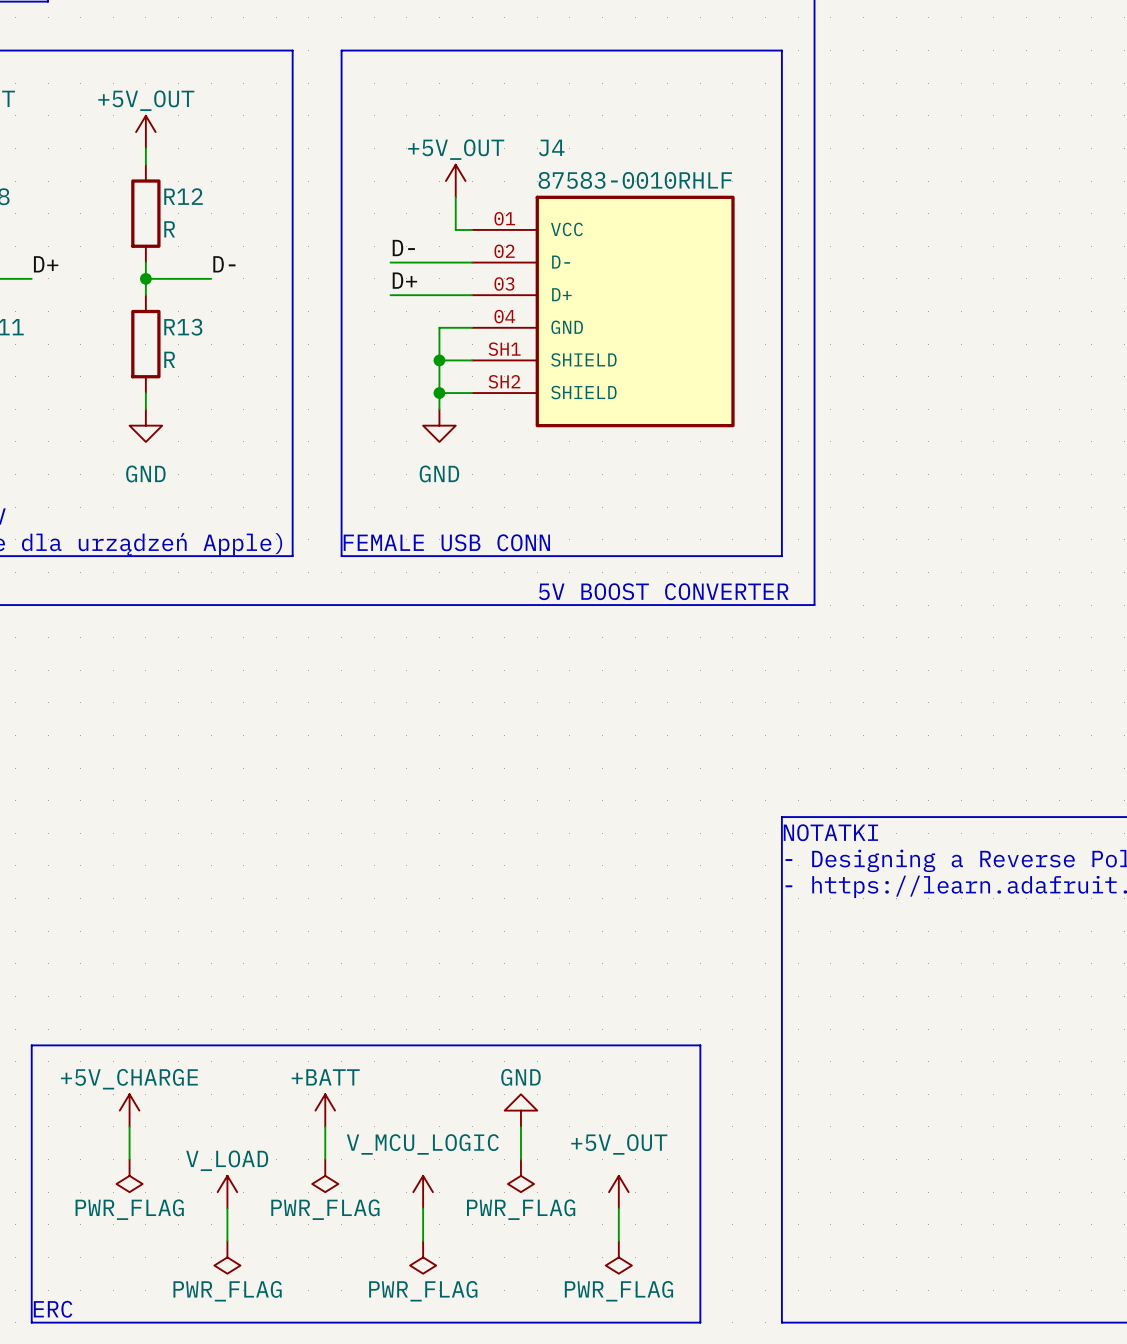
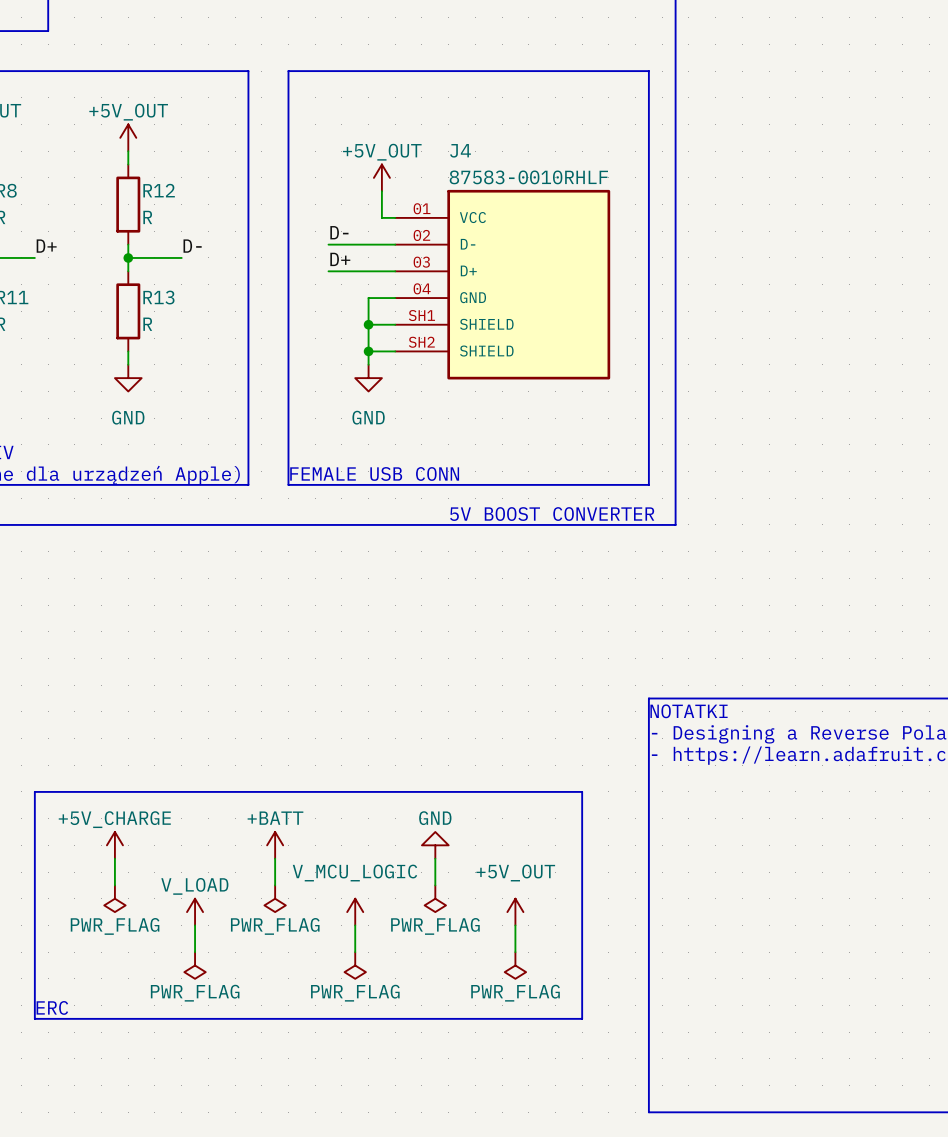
line: (31, 1045) (700, 1045) -> (34, 885) (34, 791) (582, 791) (582, 885)
power symbol: none -> PWR_FLAG (114, 898)
power symbol: none -> PWR_FLAG (275, 898)
power symbol: none -> PWR_FLAG (435, 898)
power symbol position: +5V_CHARGE (129, 1110) -> +5V_CHARGE (114, 845)
power symbol position: +BATT (325, 1110) -> +BATT (275, 845)
power symbol position: GND (520, 1110) -> GND (435, 845)
wire: (129, 1126) (129, 1159) -> (114, 858) (114, 885)
wire: (325, 1126) (325, 1159) -> (275, 858) (275, 885)
wire: (520, 1126) (520, 1159) -> (435, 858) (435, 885)
power symbol: none -> PWR_FLAG (195, 965)
power symbol: none -> PWR_FLAG (355, 965)
power symbol: none -> PWR_FLAG (515, 965)
power symbol: PWR_FLAG (129, 1175) -> none
power symbol: PWR_FLAG (325, 1175) -> none
power symbol: PWR_FLAG (520, 1175) -> none
power symbol position: V_LOAD (227, 1192) -> V_LOAD (195, 912)
power symbol position: V_MCU_LOGIC (423, 1192) -> V_MCU_LOGIC (355, 912)
power symbol position: +5V_OUT (618, 1192) -> +5V_OUT (515, 912)
line: (31, 1208) (31, 1322) (700, 1322) (700, 1208) -> (34, 1018) (582, 1018)
wire: (227, 1208) (227, 1241) -> (195, 925) (195, 952)
wire: (423, 1208) (423, 1241) -> (355, 925) (355, 952)
wire: (618, 1208) (618, 1241) -> (515, 925) (515, 952)
power symbol: PWR_FLAG (227, 1257) -> none
power symbol: PWR_FLAG (423, 1257) -> none
power symbol: PWR_FLAG (618, 1257) -> none
text position: ERC (53, 1309) -> ERC (52, 1007)

